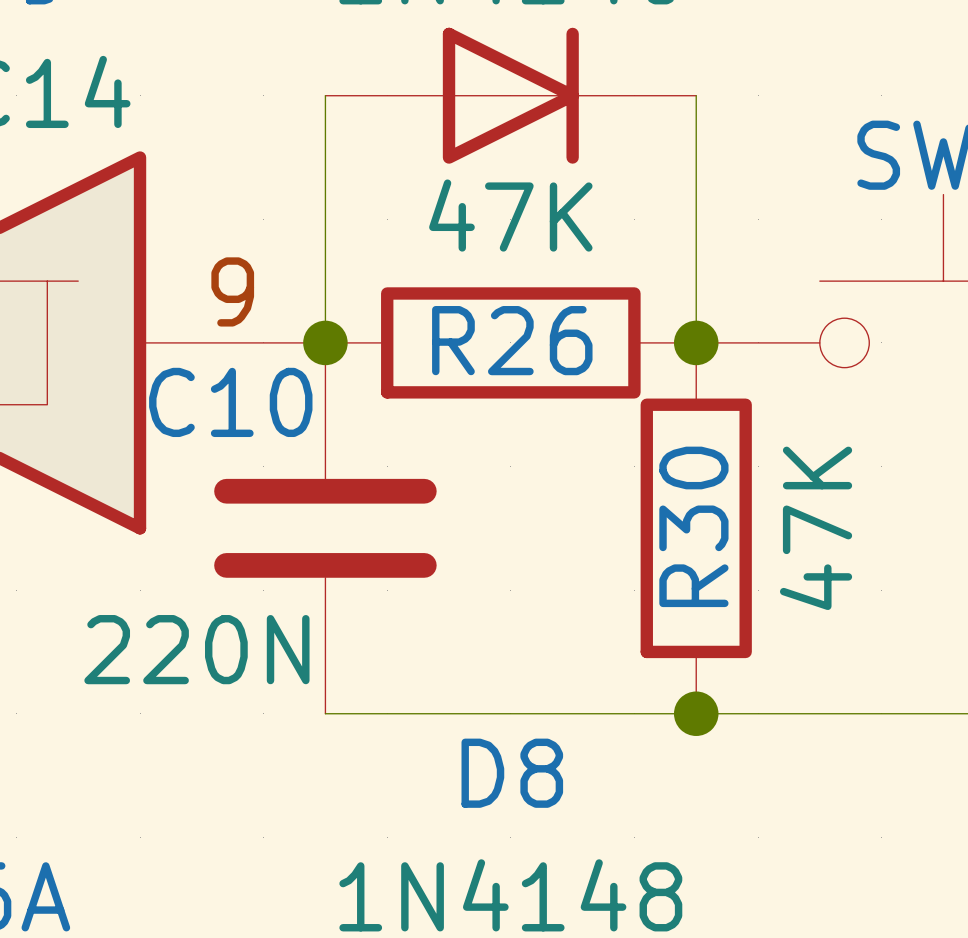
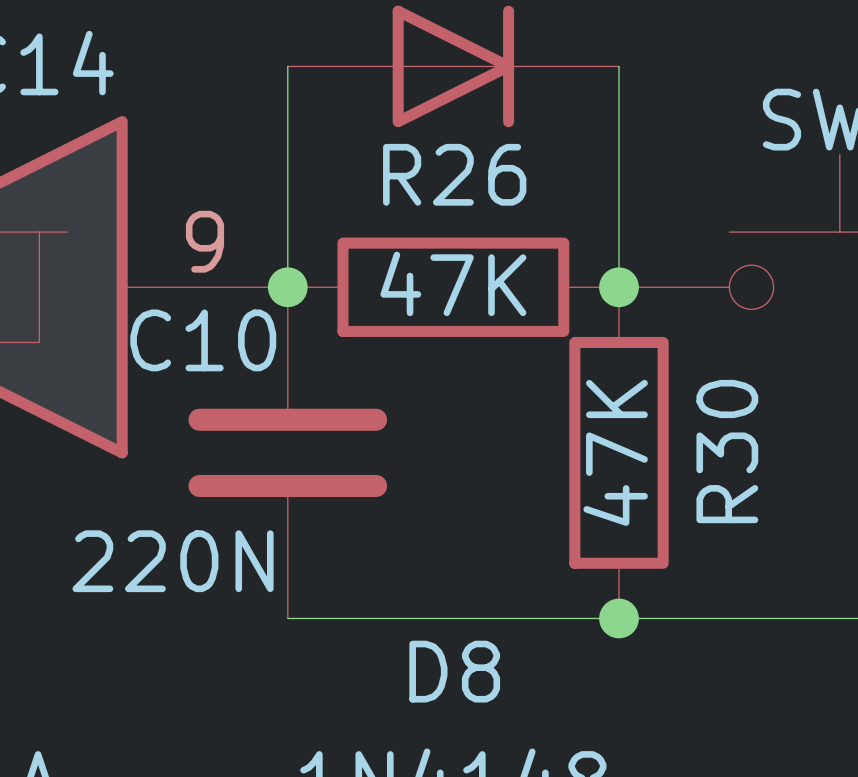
R26 value position: 47K (510, 215) -> 47K (453, 283)
R26 name position: R26 (512, 340) -> R26 (454, 174)
R30 name position: R30 (693, 526) -> R30 (727, 451)
R30 value position: 47K (816, 528) -> 47K (615, 452)

